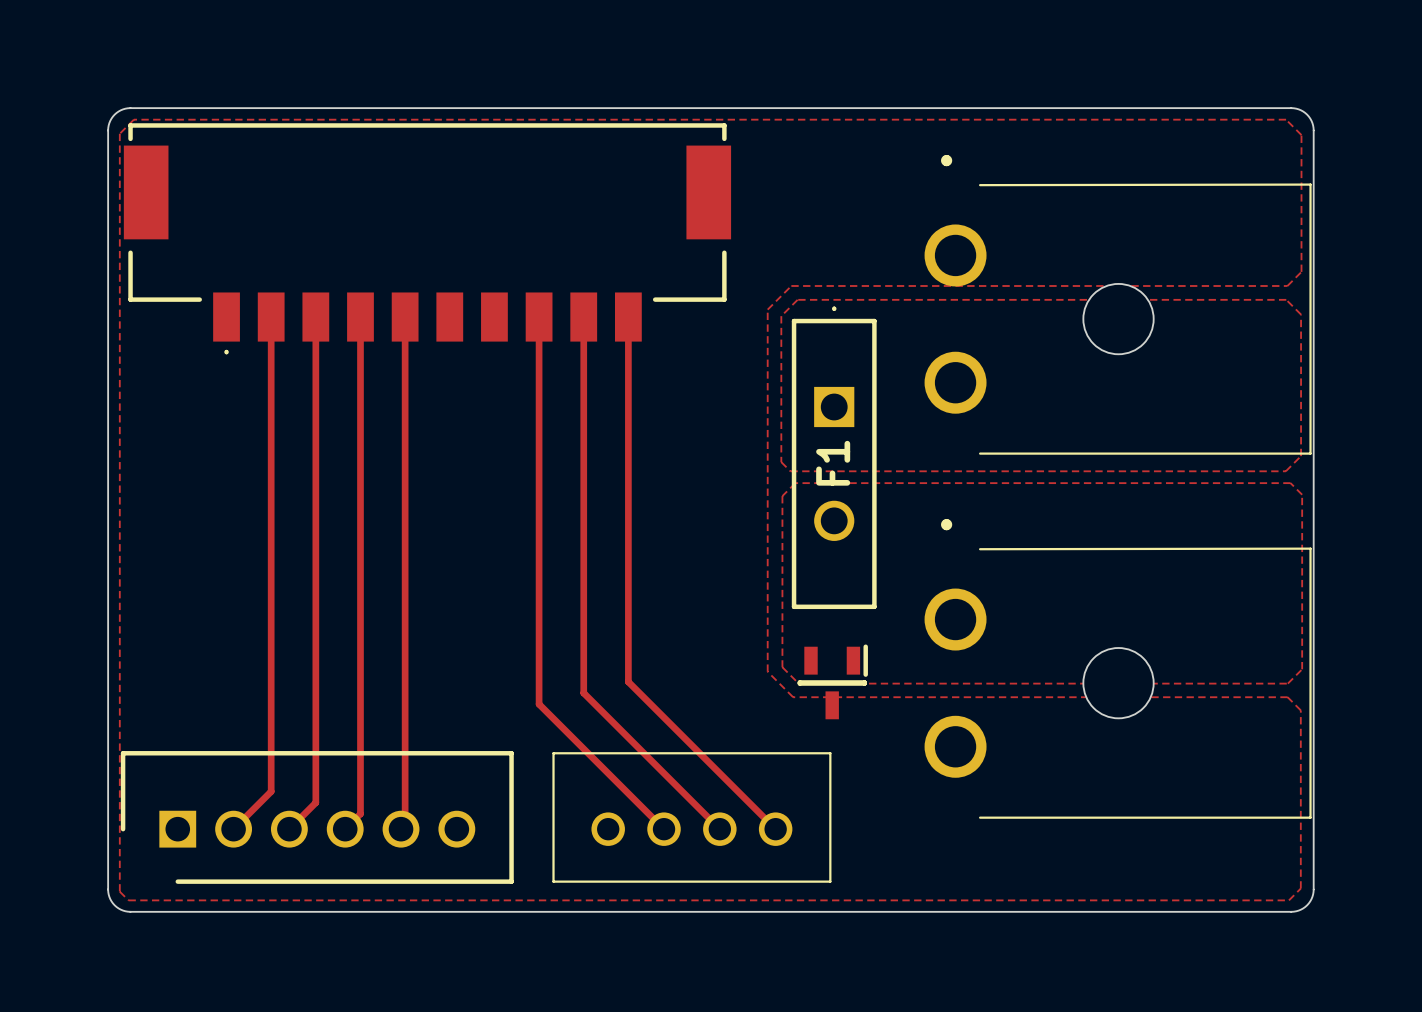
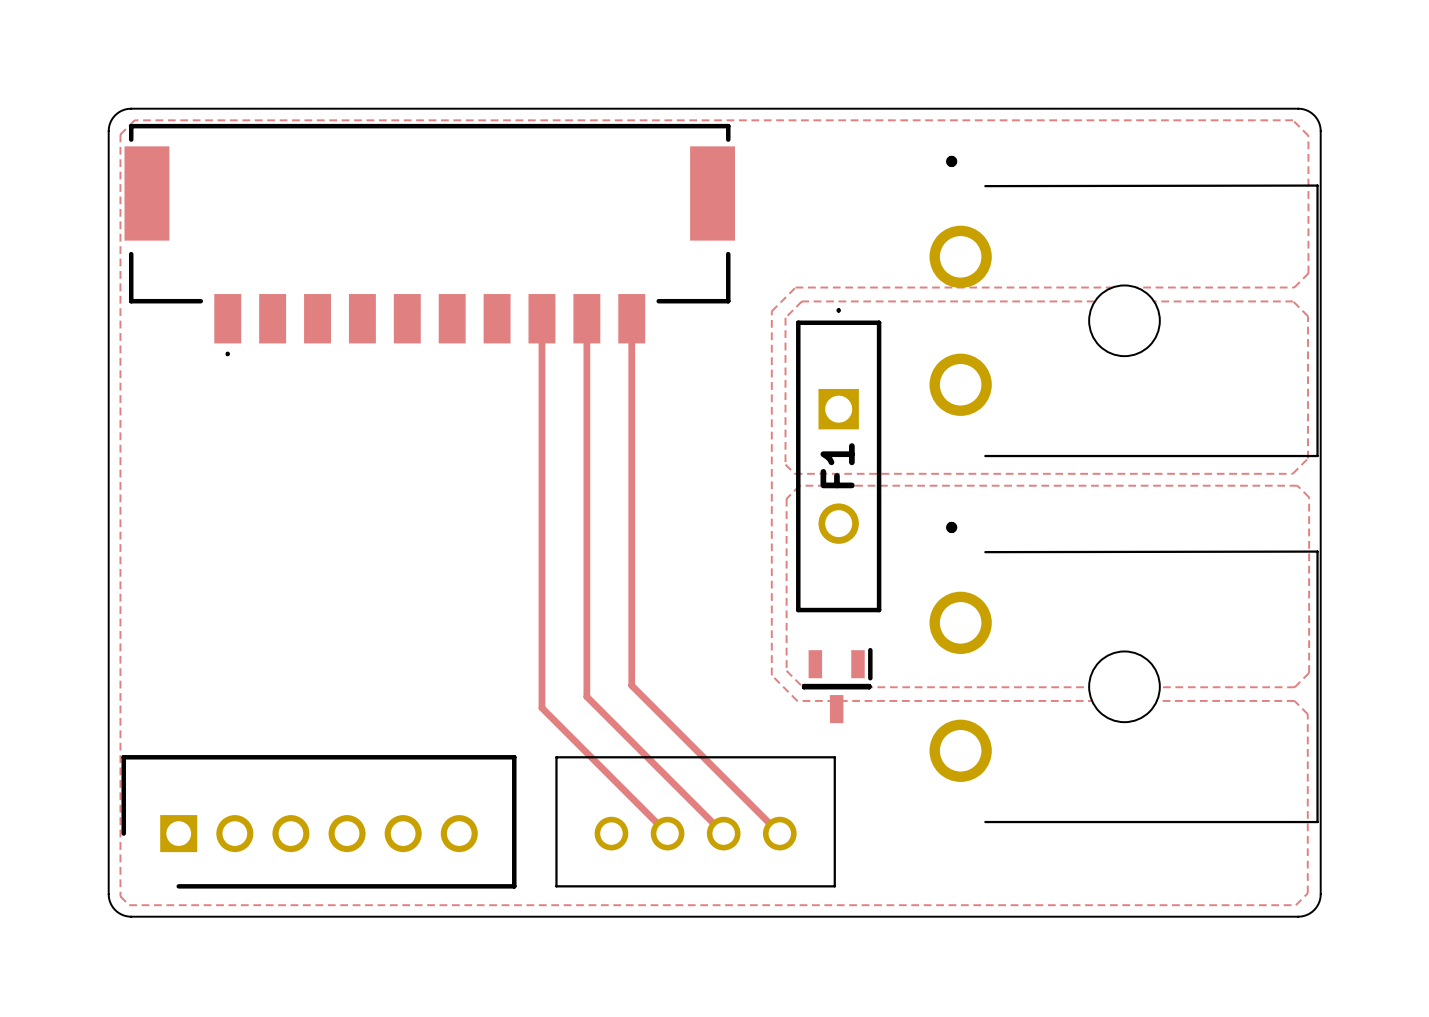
track: (271, 317) (271, 791) (233, 829) -> none
track: (315, 317) (315, 802) (289, 829) -> none
track: (360, 317) (360, 813) (345, 829) -> none
track: (405, 317) (405, 825) (401, 829) -> none

